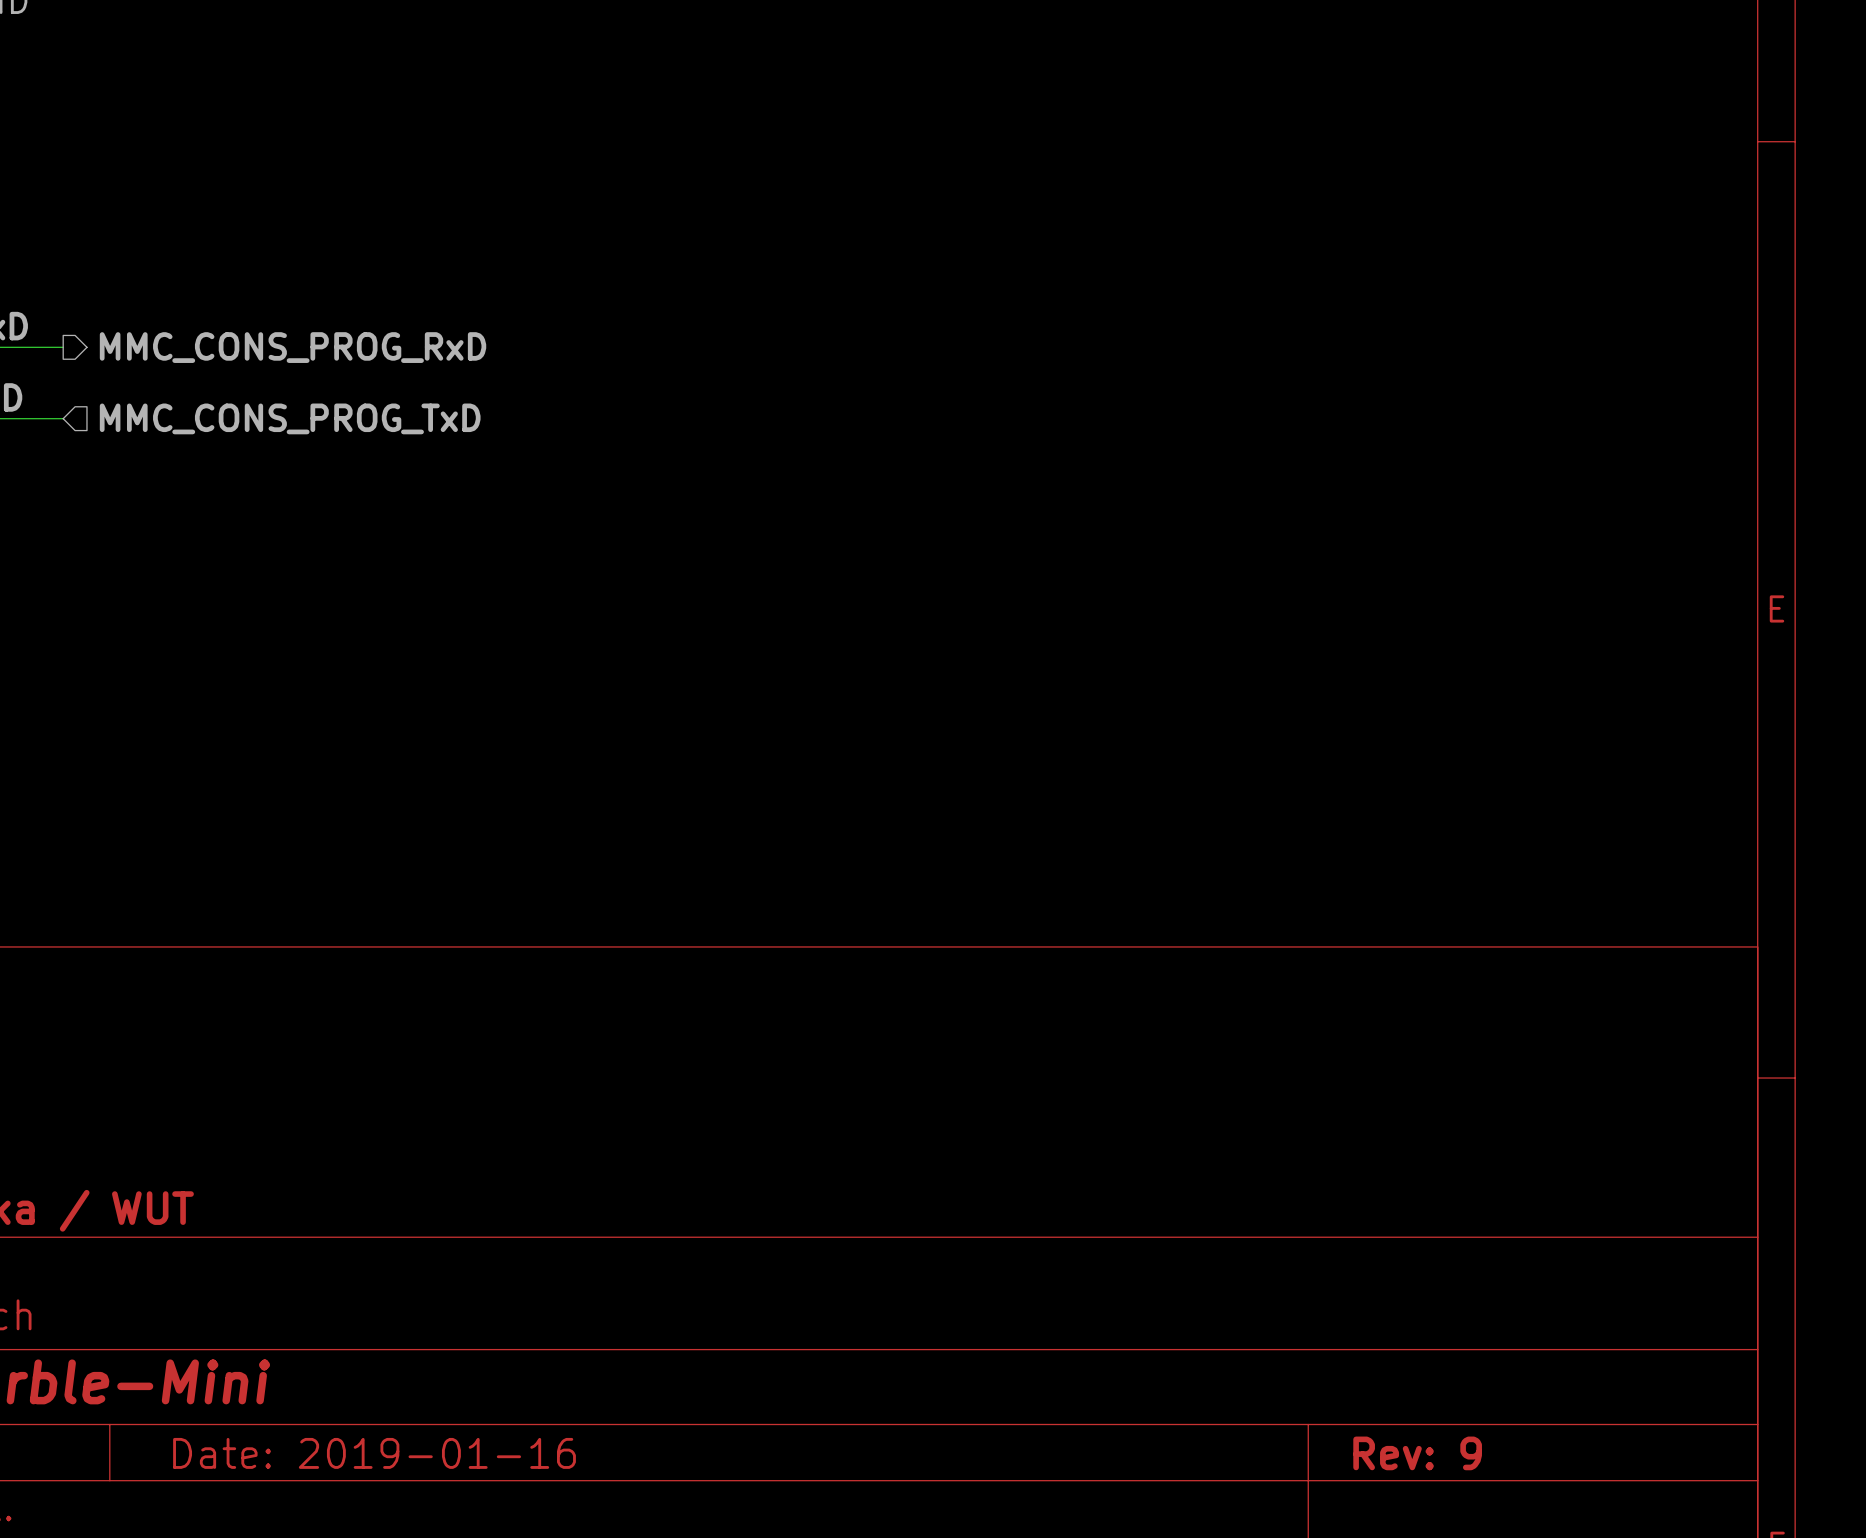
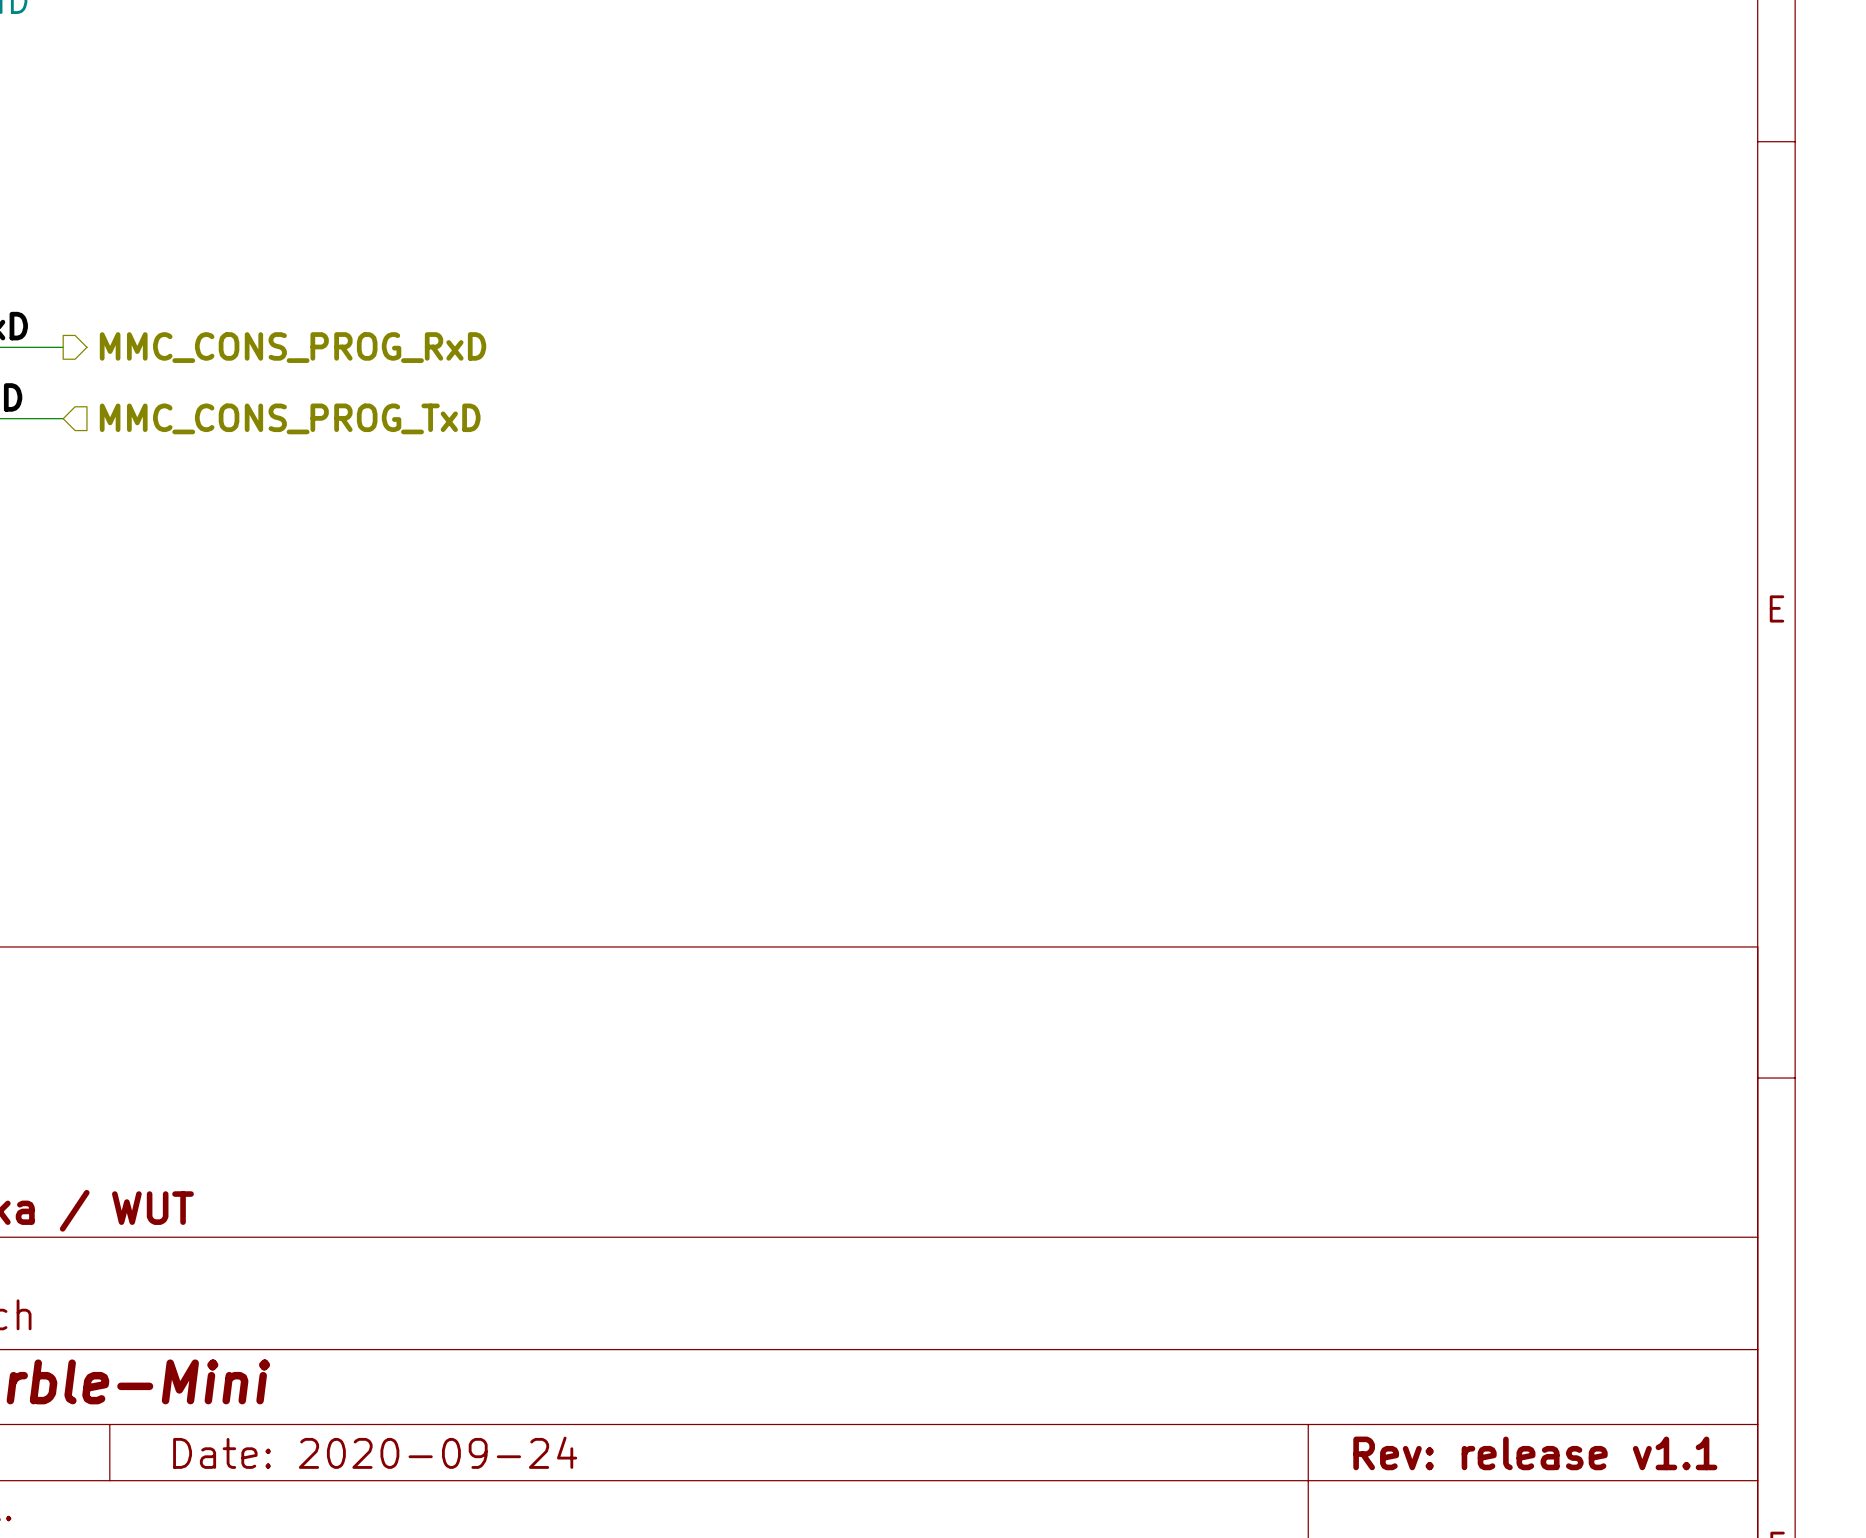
title block: Date: 2019-01-16 (374, 1453) -> Date: 2020-09-24 (375, 1452)
title block: Rev: 9 (1417, 1453) -> Rev: release v1.1 (1535, 1453)

